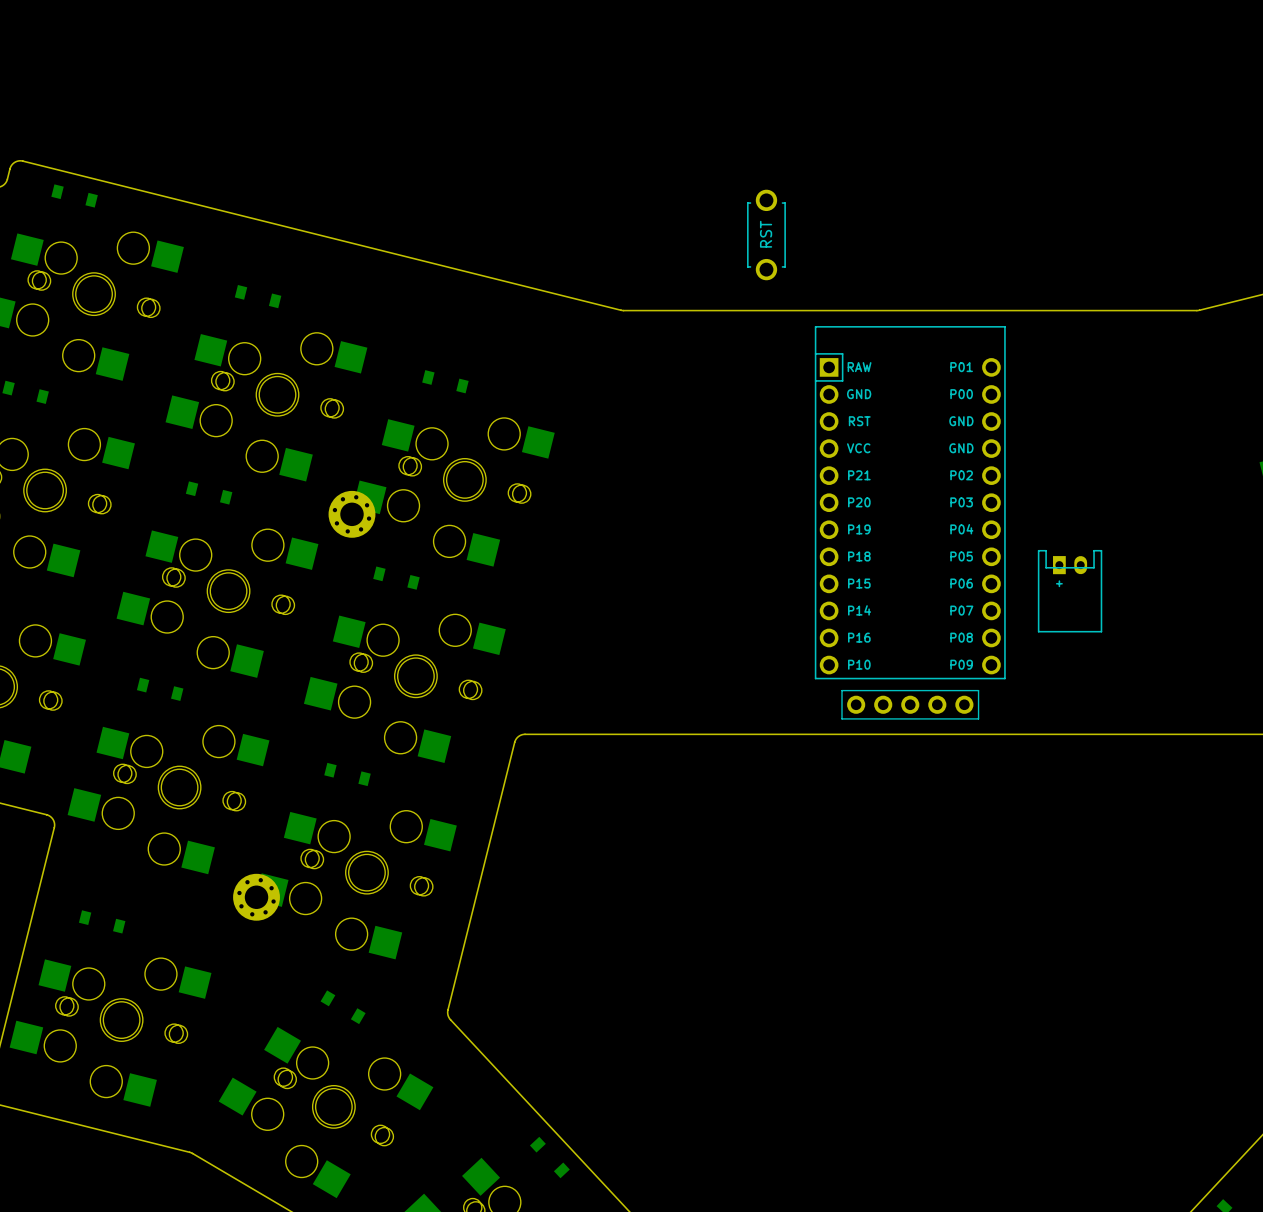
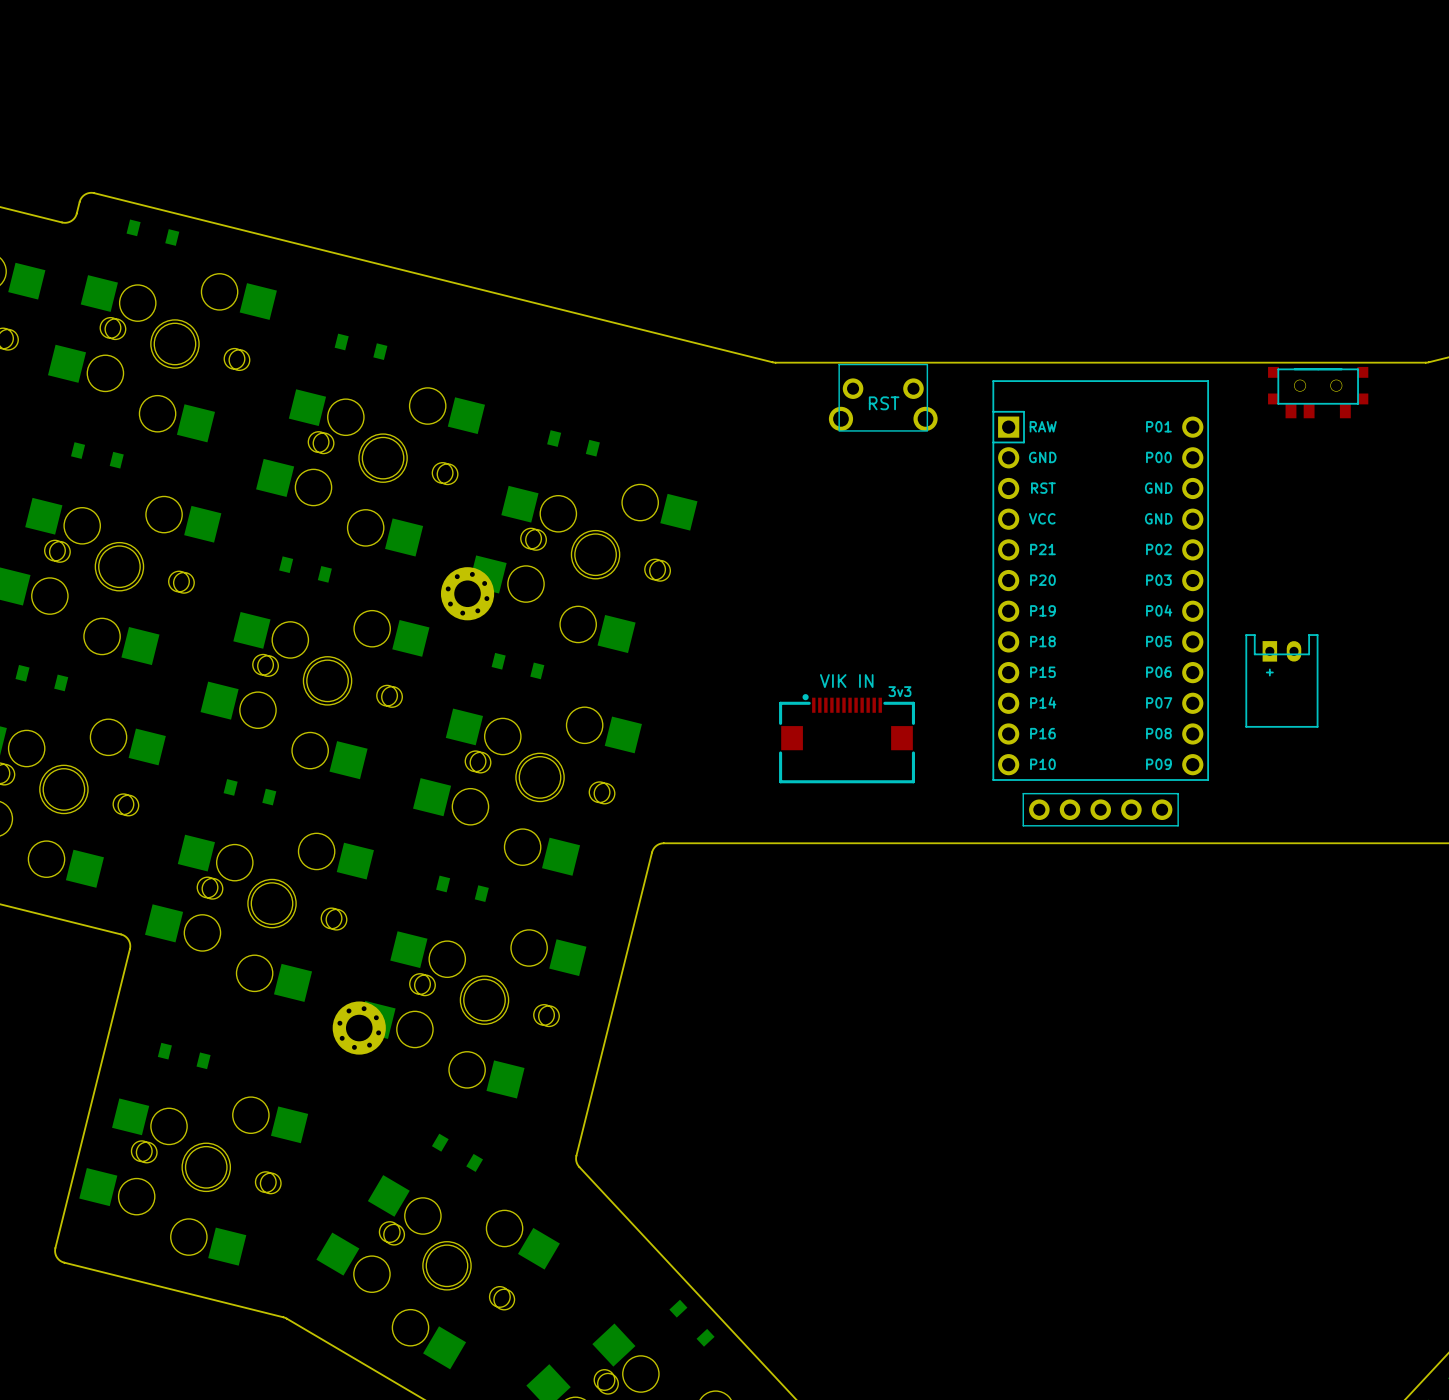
part: (766, 234) -> none
part: none -> (1318, 392)
part: none -> (883, 397)
part: none -> (847, 738)

